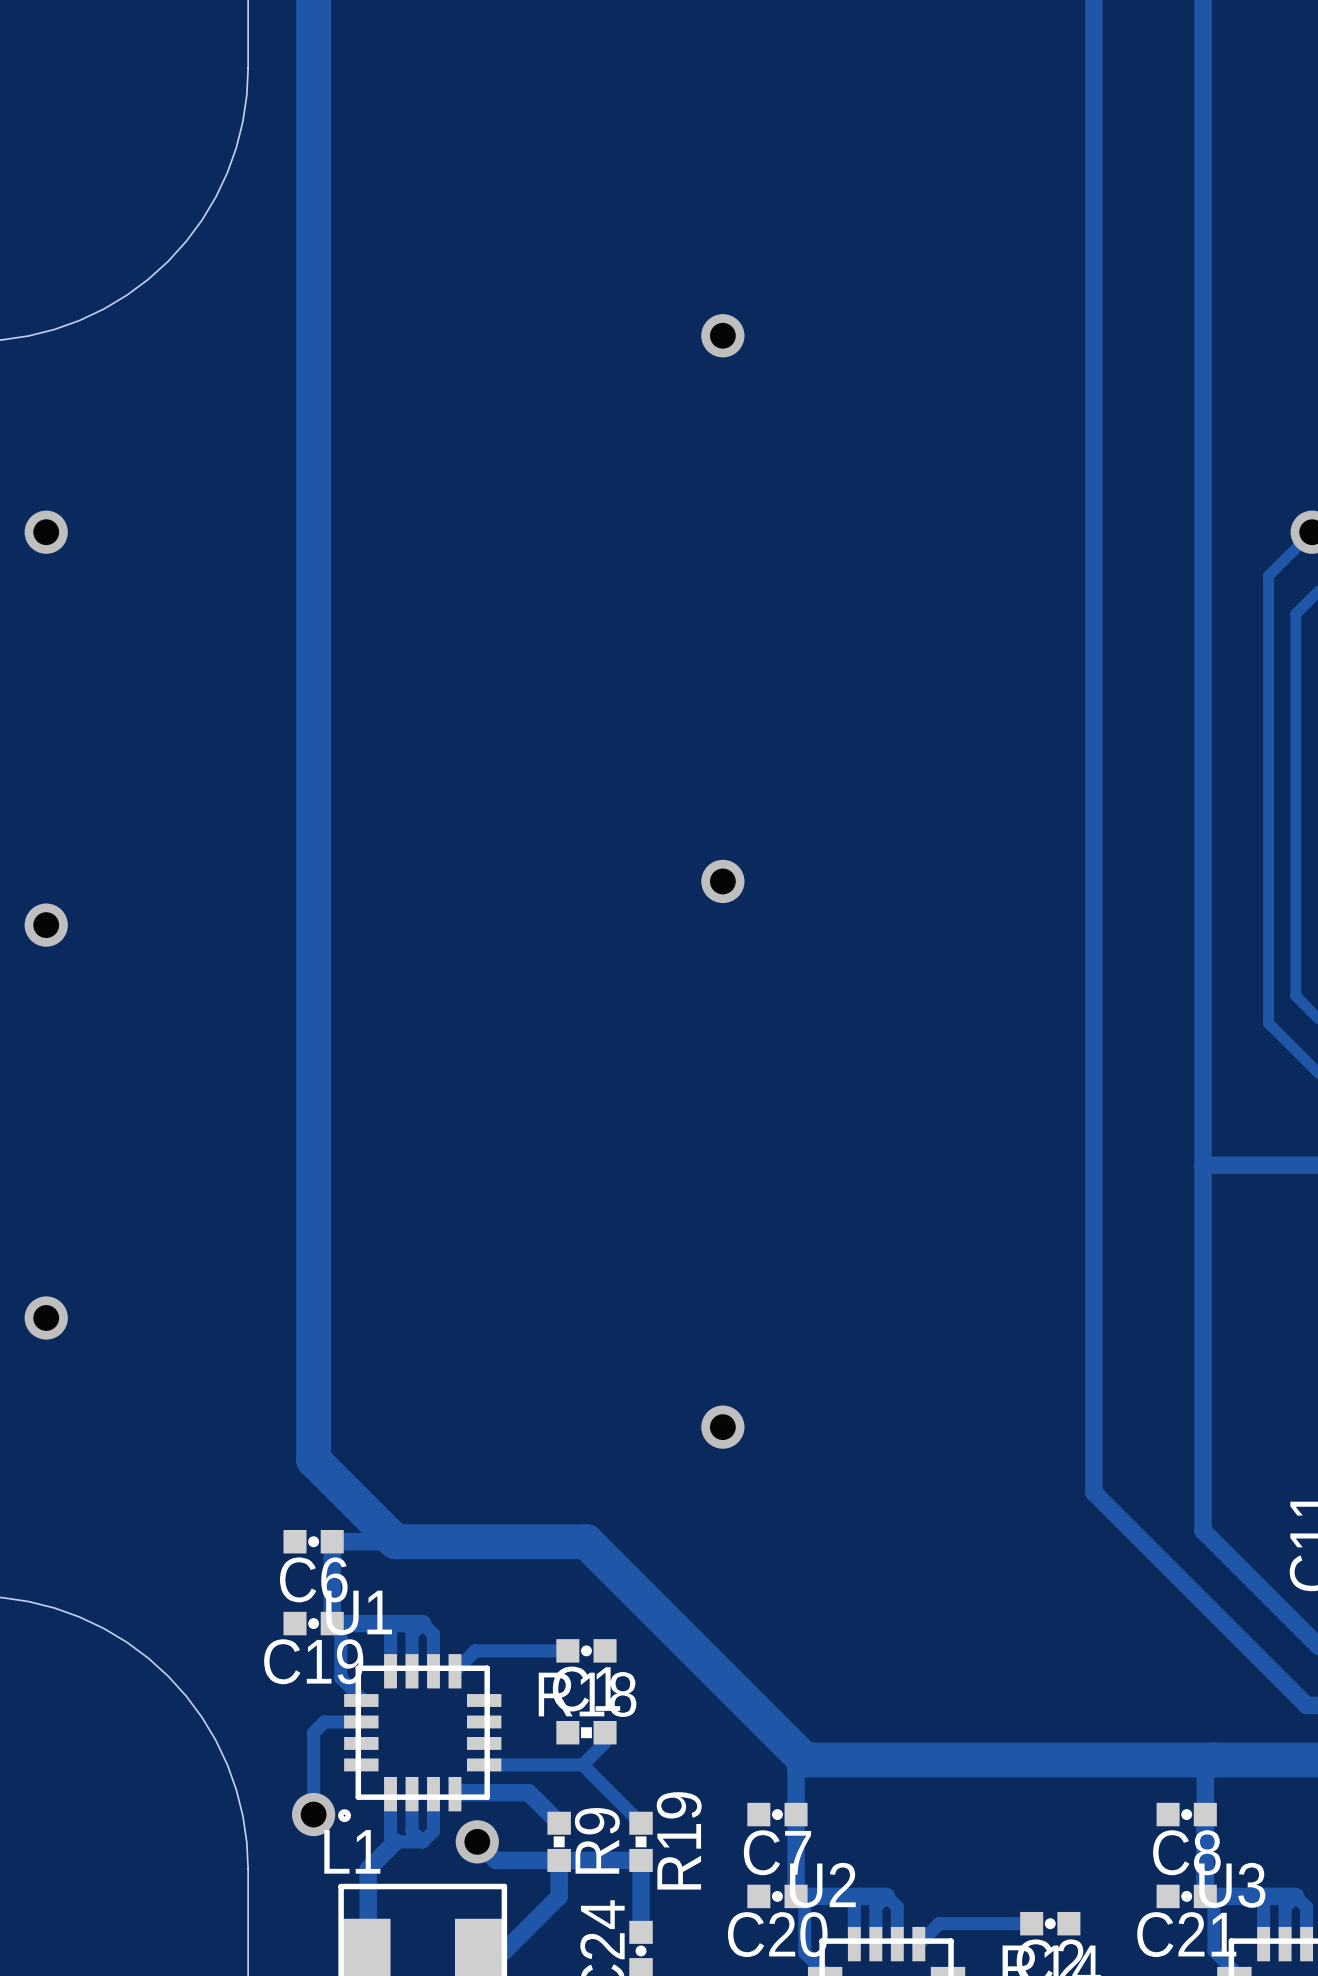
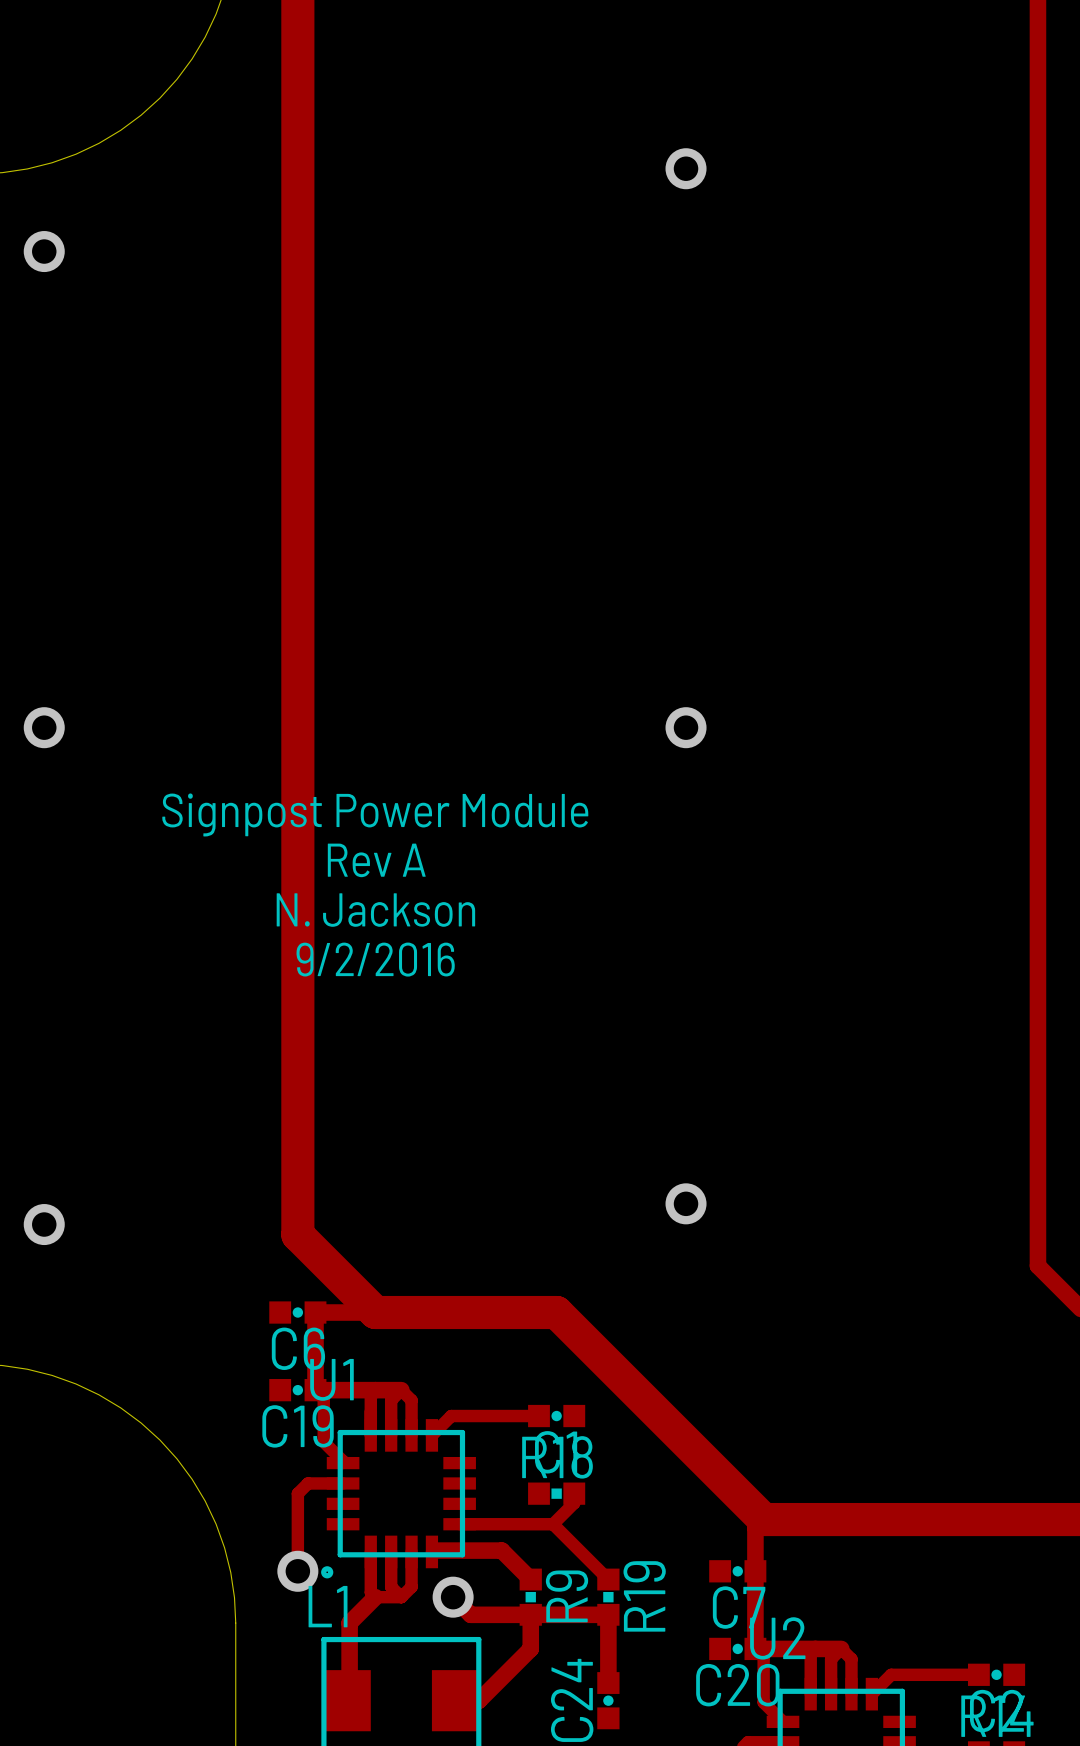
via position: (46, 532) -> (44, 251)
via position: (722, 881) -> (686, 727)
text: none -> Signpost Power Module (375, 814)
text: none -> Rev A (376, 860)
text: none -> N. Jackson (375, 910)
text: none -> 9/2/2016 (375, 959)
via position: (46, 1317) -> (44, 1224)

